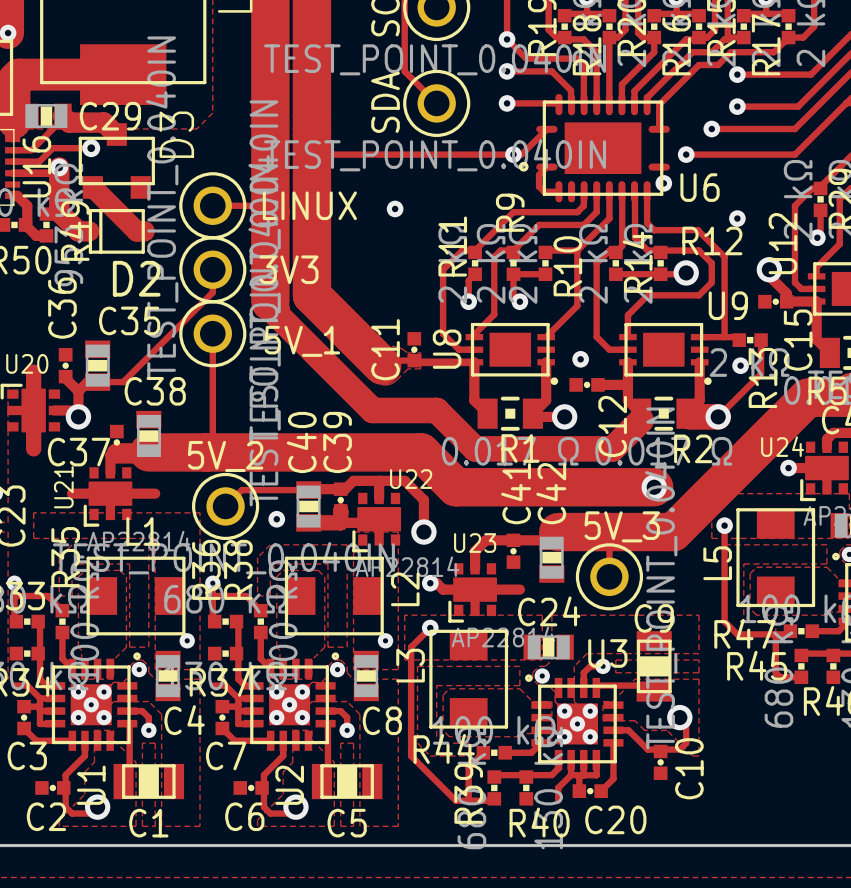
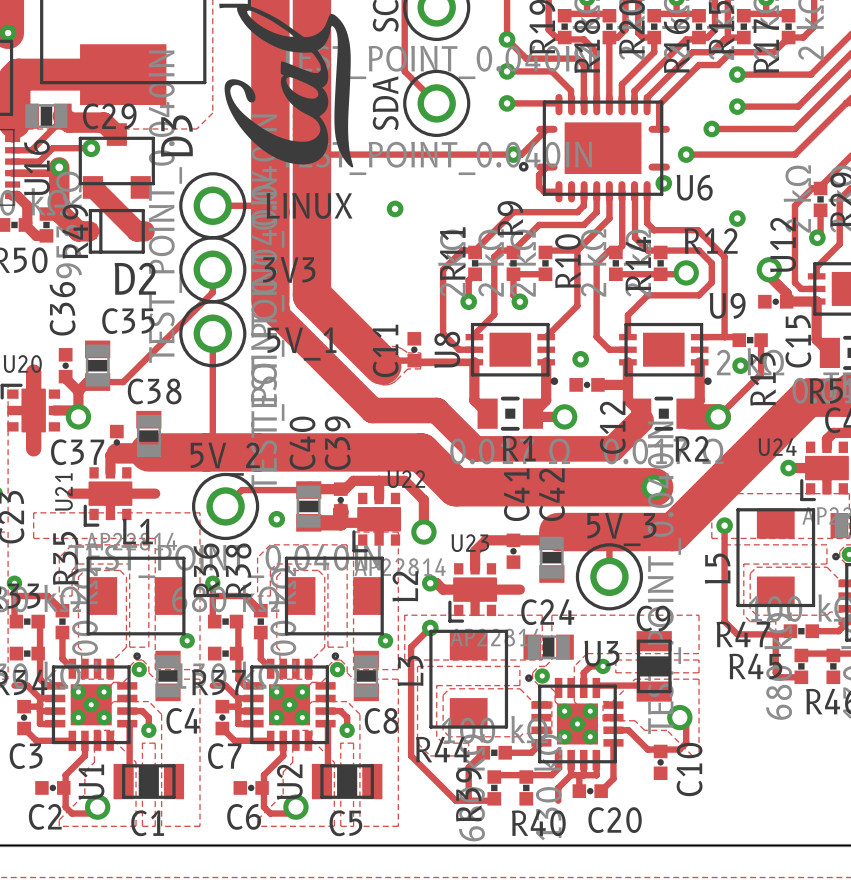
drawing: none -> [224, 4, 354, 168]

